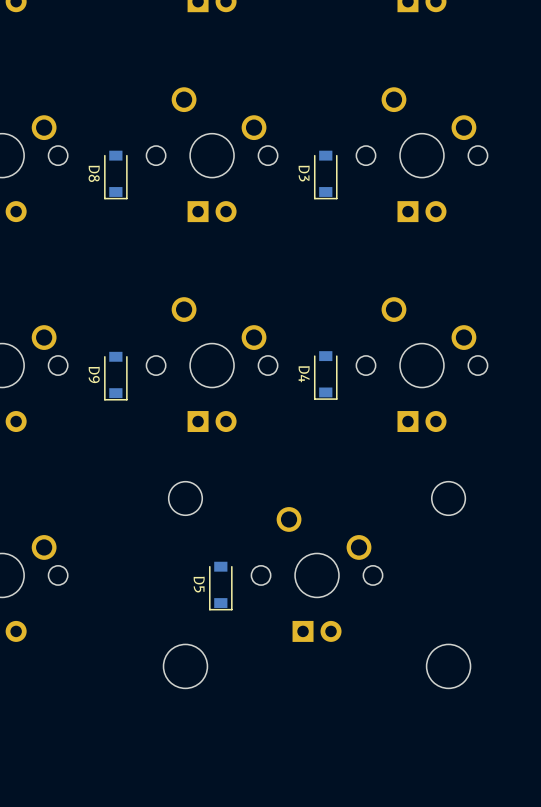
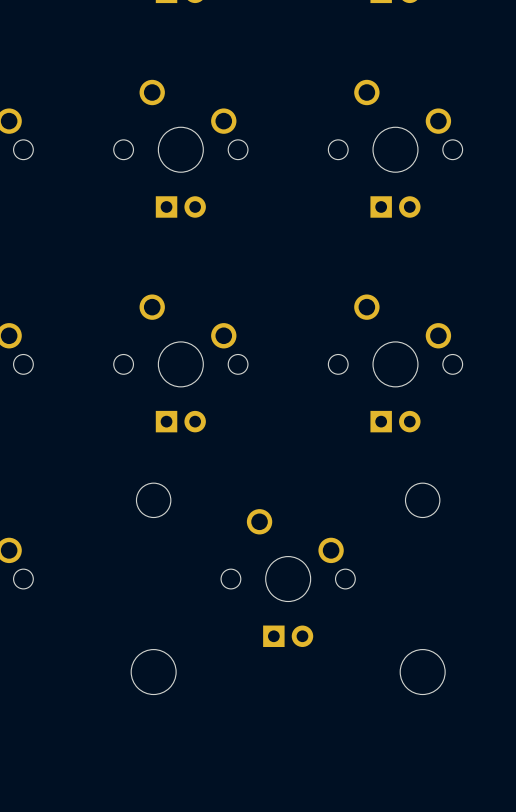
D8: (115, 174) -> none
D3: (325, 174) -> none
D4: (325, 375) -> none
D9: (115, 376) -> none
D5: (220, 586) -> none

